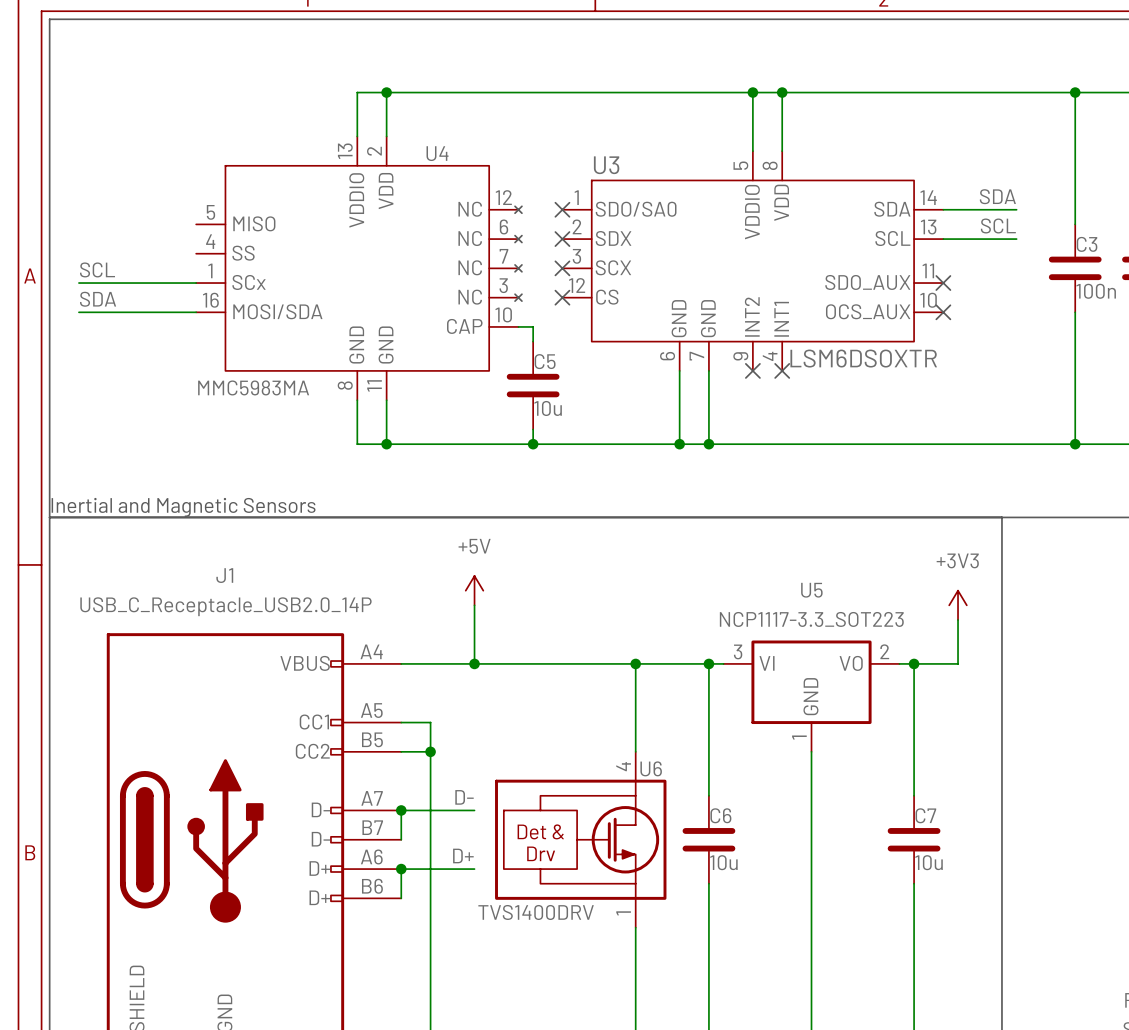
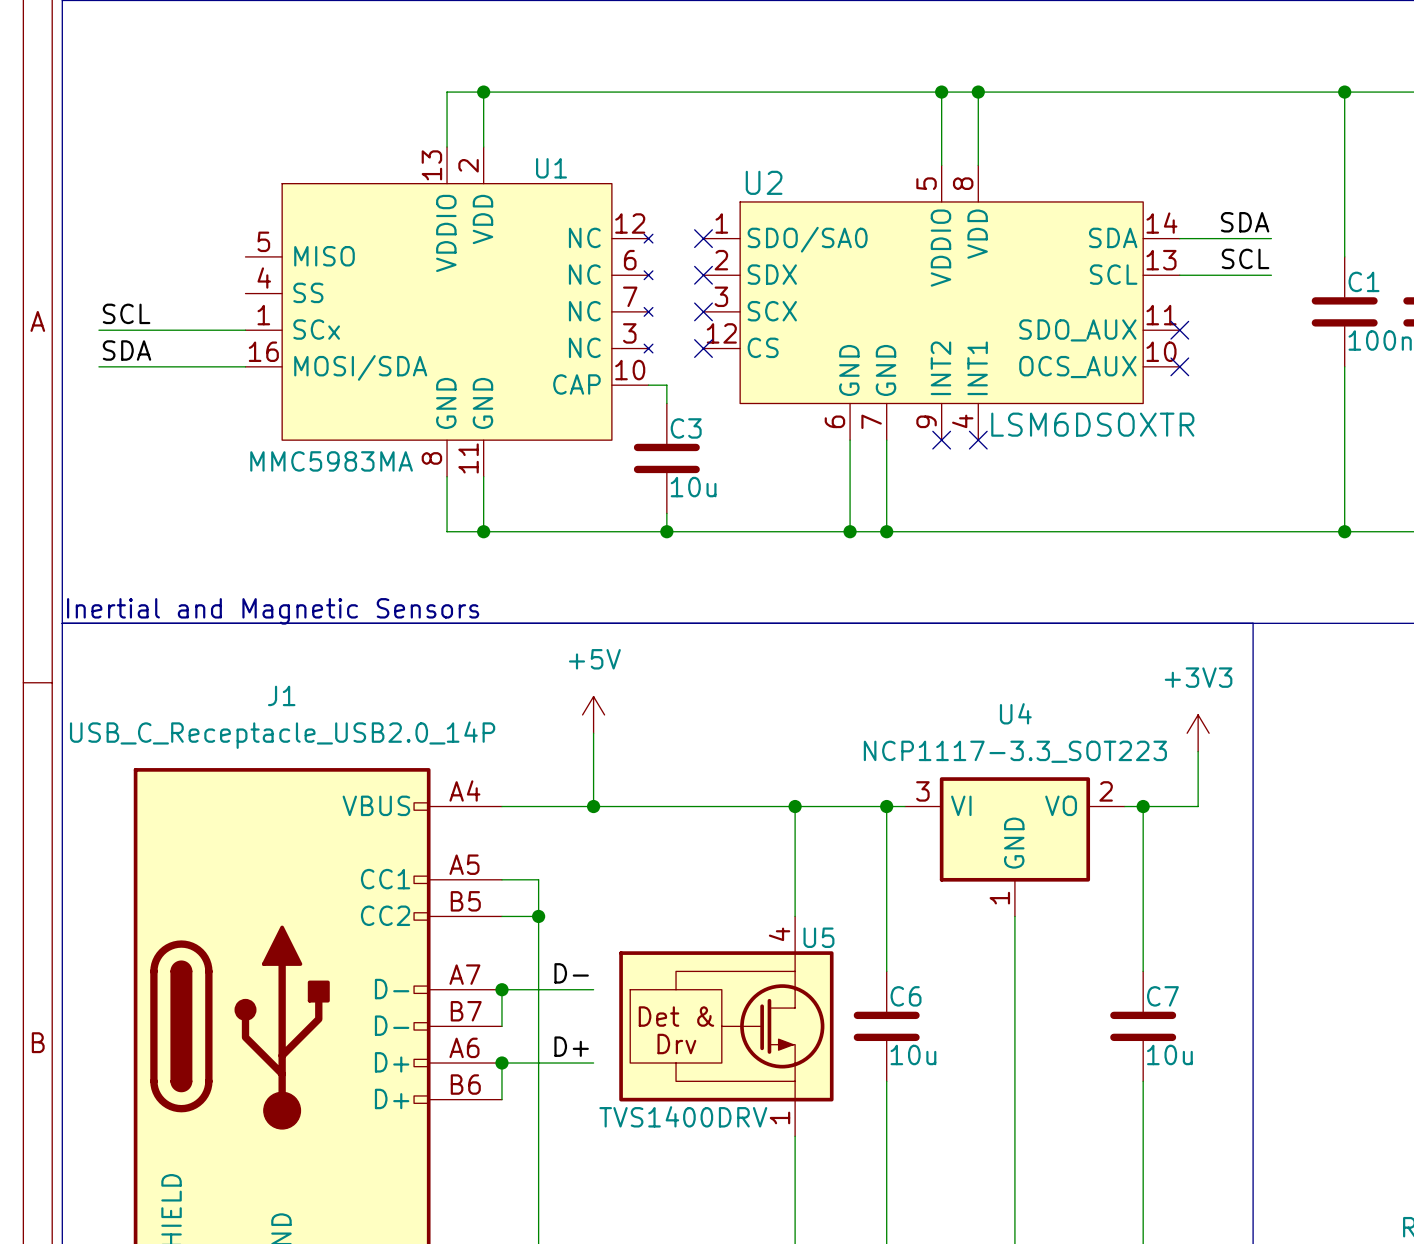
U4 name: U4 (437, 153) -> U1 (551, 168)
U3 name: U3 (606, 165) -> U2 (764, 182)
C3 name: C3 (1087, 244) -> C1 (1364, 281)
C5 name: C5 (545, 361) -> C3 (686, 428)
U5 name: U5 (811, 590) -> U4 (1015, 713)
U6 name: U6 (651, 768) -> U5 (818, 937)

